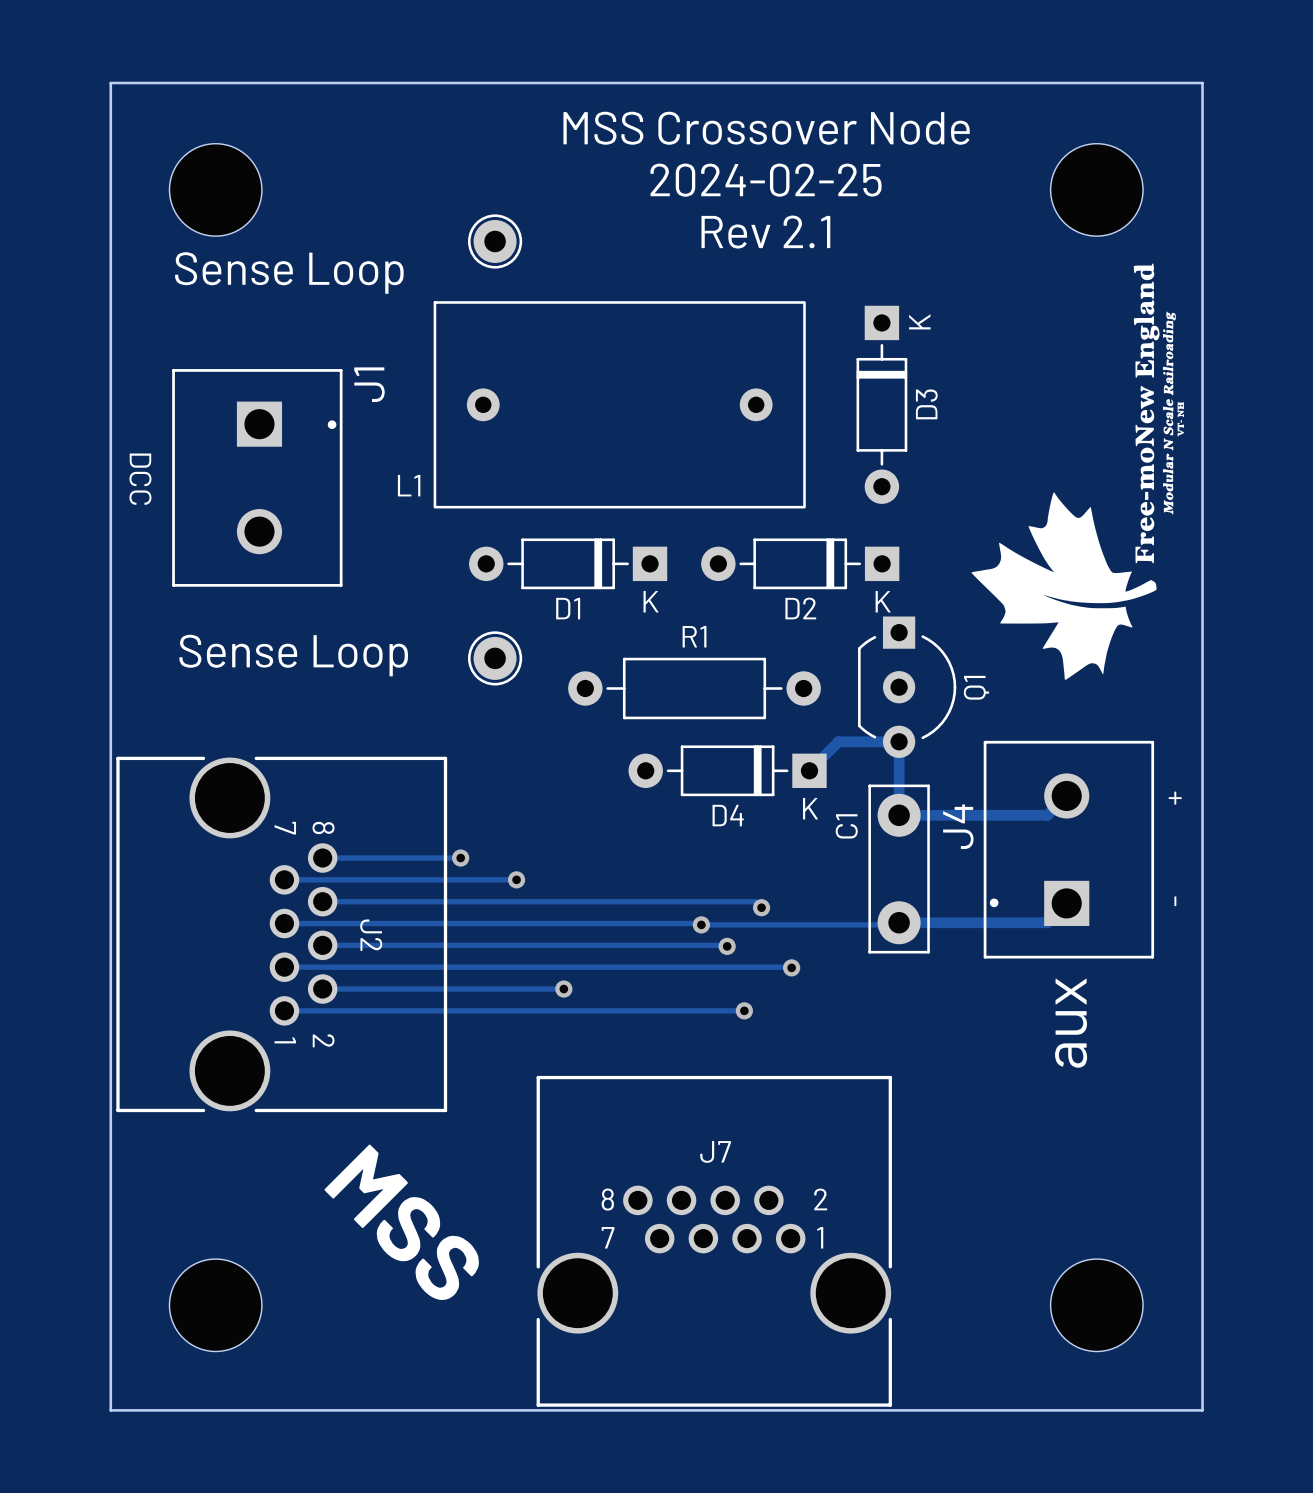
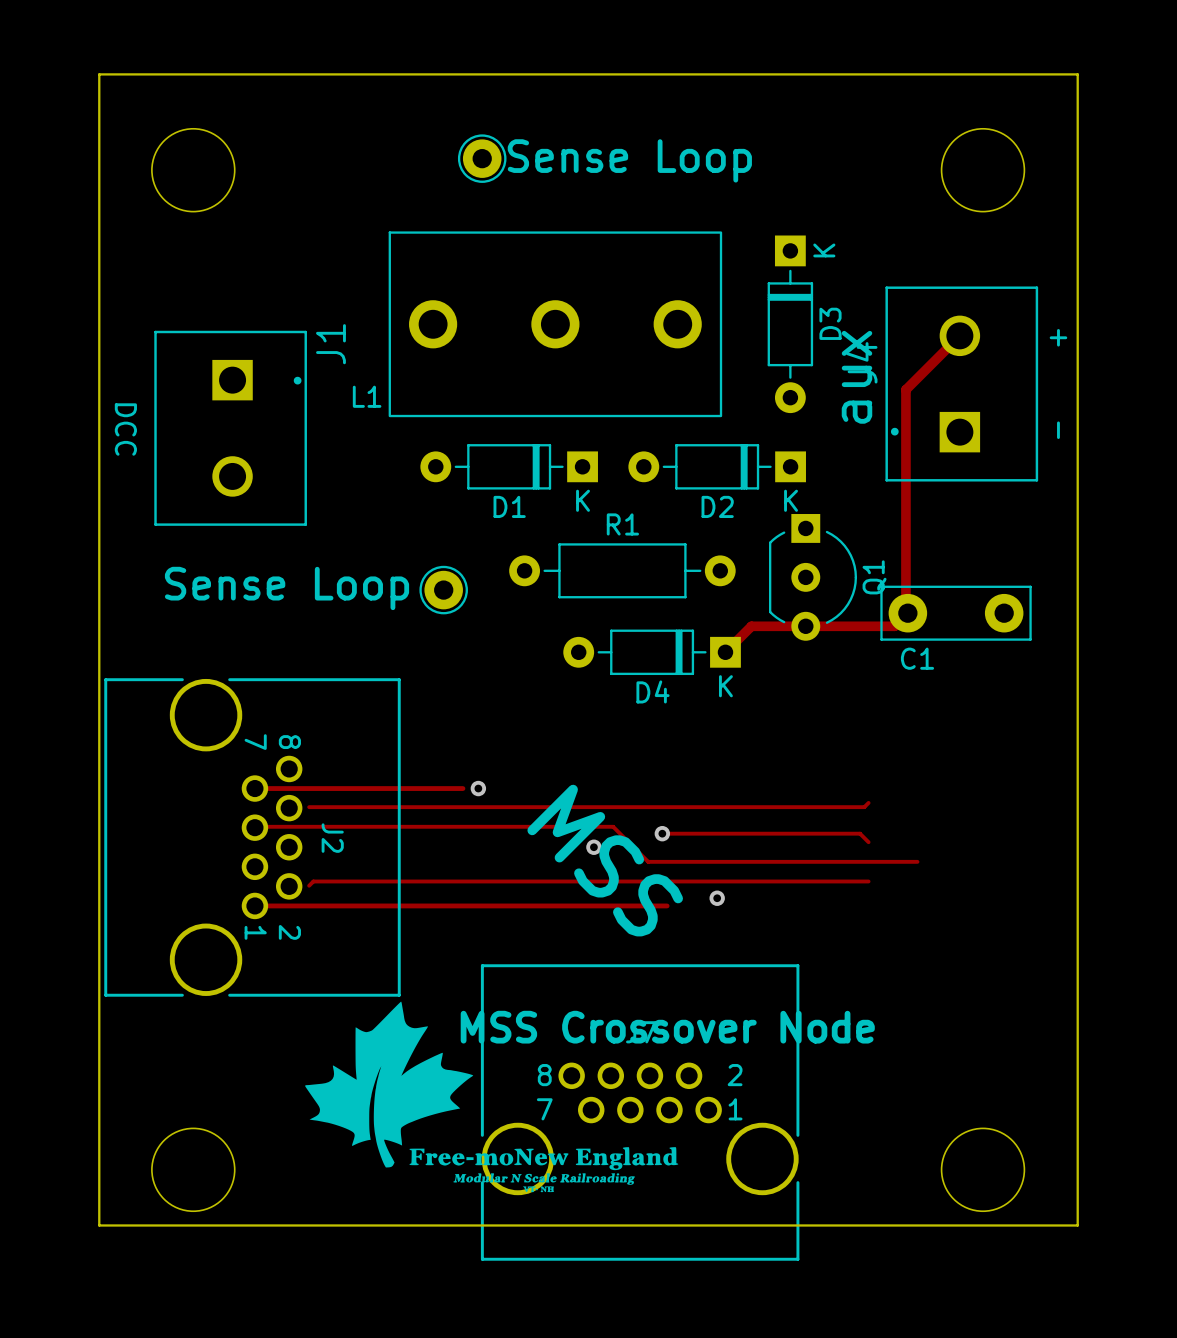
text: MSS Crossover Node (766, 128) -> none
text: 2024-02-25 (766, 180) -> none
text: Rev 2.1 (765, 232) -> none
part position: (495, 241) -> (482, 158)
drawing: [971, 263, 1185, 680] -> none
text position: Sense Loop (289, 272) -> Sense Loop (629, 160)
L1 footprint: [433, 301, 806, 509] -> [388, 231, 723, 418]
track: none -> (959, 335) (905, 389) (905, 615) (894, 626) (751, 626) (725, 652)
D3 position: (881, 404) -> (790, 324)
D1 position: (568, 563) -> (509, 466)
D2 position: (800, 563) -> (717, 466)
Q1 position: (907, 687) -> (813, 577)
R1 position: (694, 688) -> (622, 570)
D4 position: (727, 770) -> (652, 652)
track: (809, 770) (838, 741) (899, 741) (899, 815) (1047, 815) (1066, 795) -> none
C1 name position: C1 (846, 826) -> C1 (917, 658)
J4 position: (1068, 849) -> (961, 383)
track: (322, 858) (460, 858) -> none
via: (460, 858) -> none
C1 rotation: 0° (899, 869) -> 90° clockwise (956, 613)
C1 position: (899, 869) -> (956, 613)
via position: (516, 879) -> (478, 788)
track: none -> (868, 802) (864, 807) (309, 807)
track: (322, 901) (755, 901) (761, 907) -> none
track: (1066, 903) (1047, 922) (899, 922) (896, 924) (284, 923) -> none
via: (761, 907) -> none
track: none -> (260, 826) (613, 826) (648, 861) (917, 861)
via: (701, 924) -> none
track: none -> (662, 833) (860, 833) (868, 842)
track: (322, 945) (727, 946) -> none
via: none -> (593, 847)
via position: (727, 946) -> (662, 833)
track: (284, 967) (791, 967) -> none
via: (791, 967) -> none
track: none -> (868, 881) (313, 881) (309, 885)
track: (322, 989) (563, 989) -> none
via: (563, 989) -> none
via: none -> (717, 898)
via: (744, 1010) -> none
J4 text position: aux (1071, 1023) -> aux (856, 377)
drawing: none -> [305, 1001, 679, 1193]
text: none -> MSS Crossover Node (667, 1027)
text position: MSS (402, 1222) -> MSS (605, 860)
board edge: (110, 1367) (110, 1410) (1202, 1410) (1202, 1367) -> (99, 1225) (1077, 1225)

